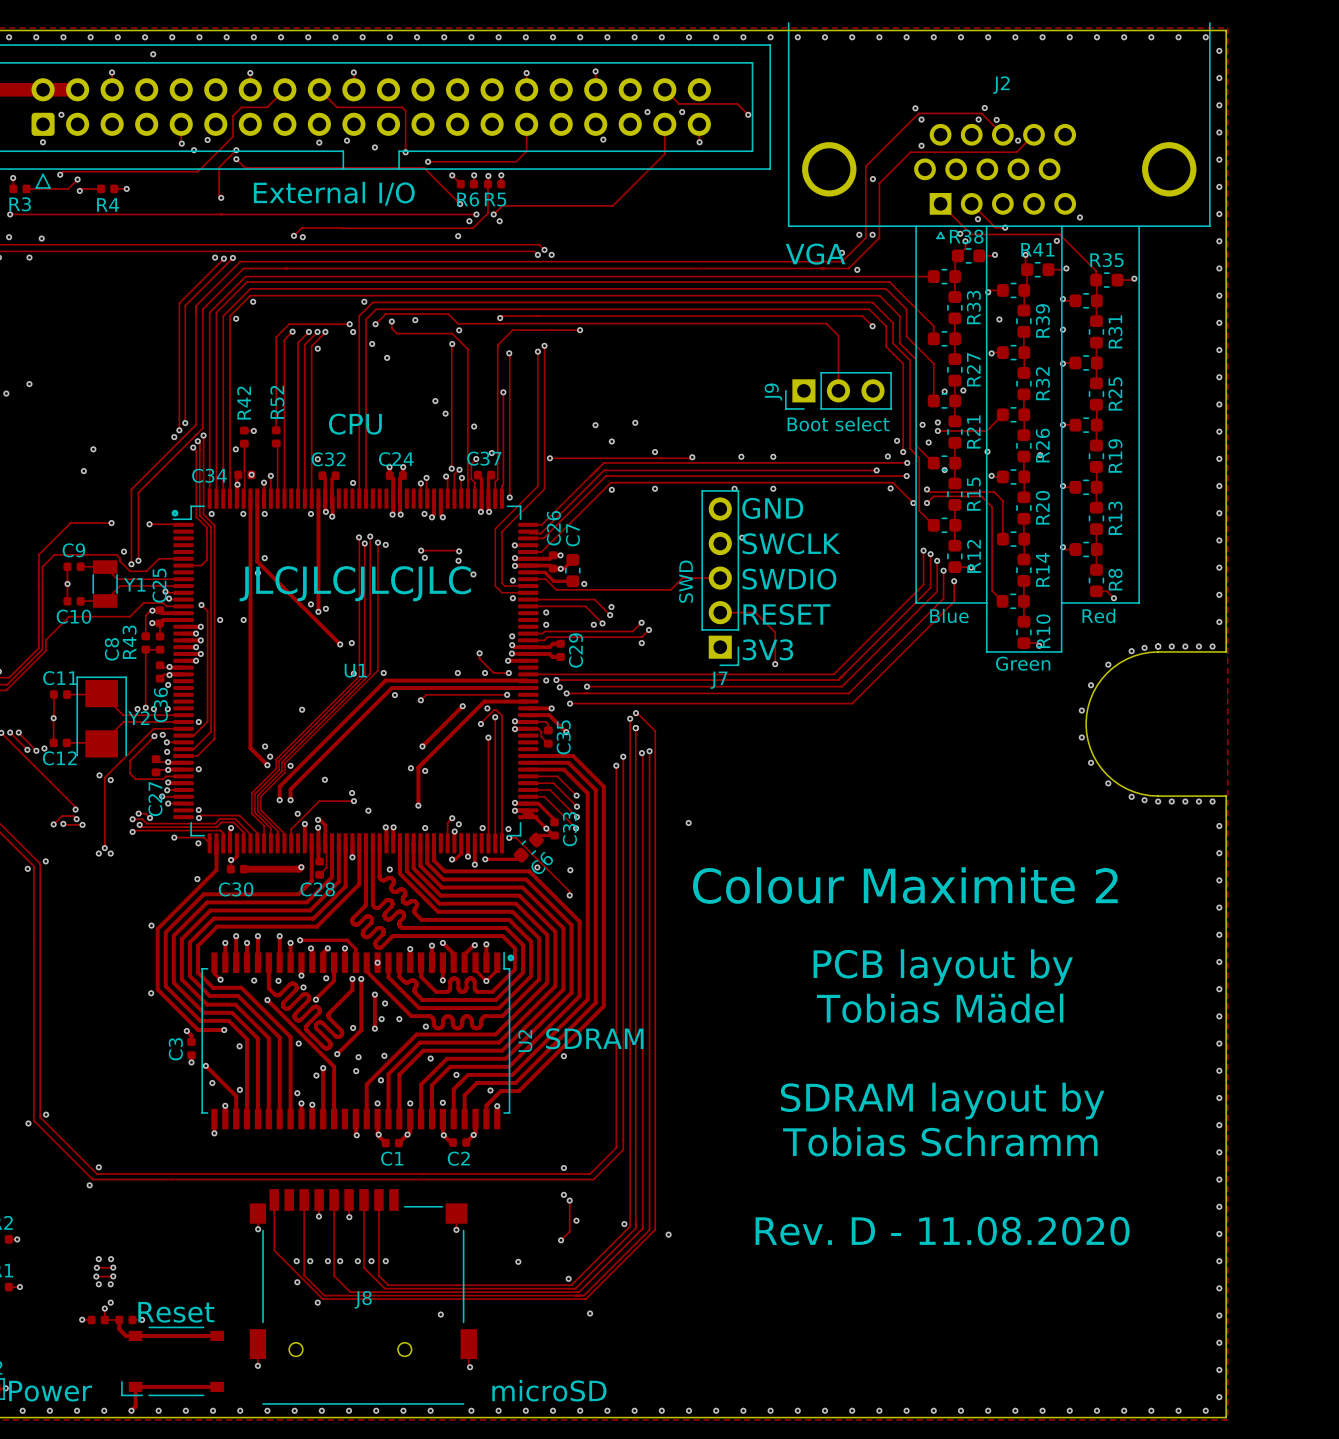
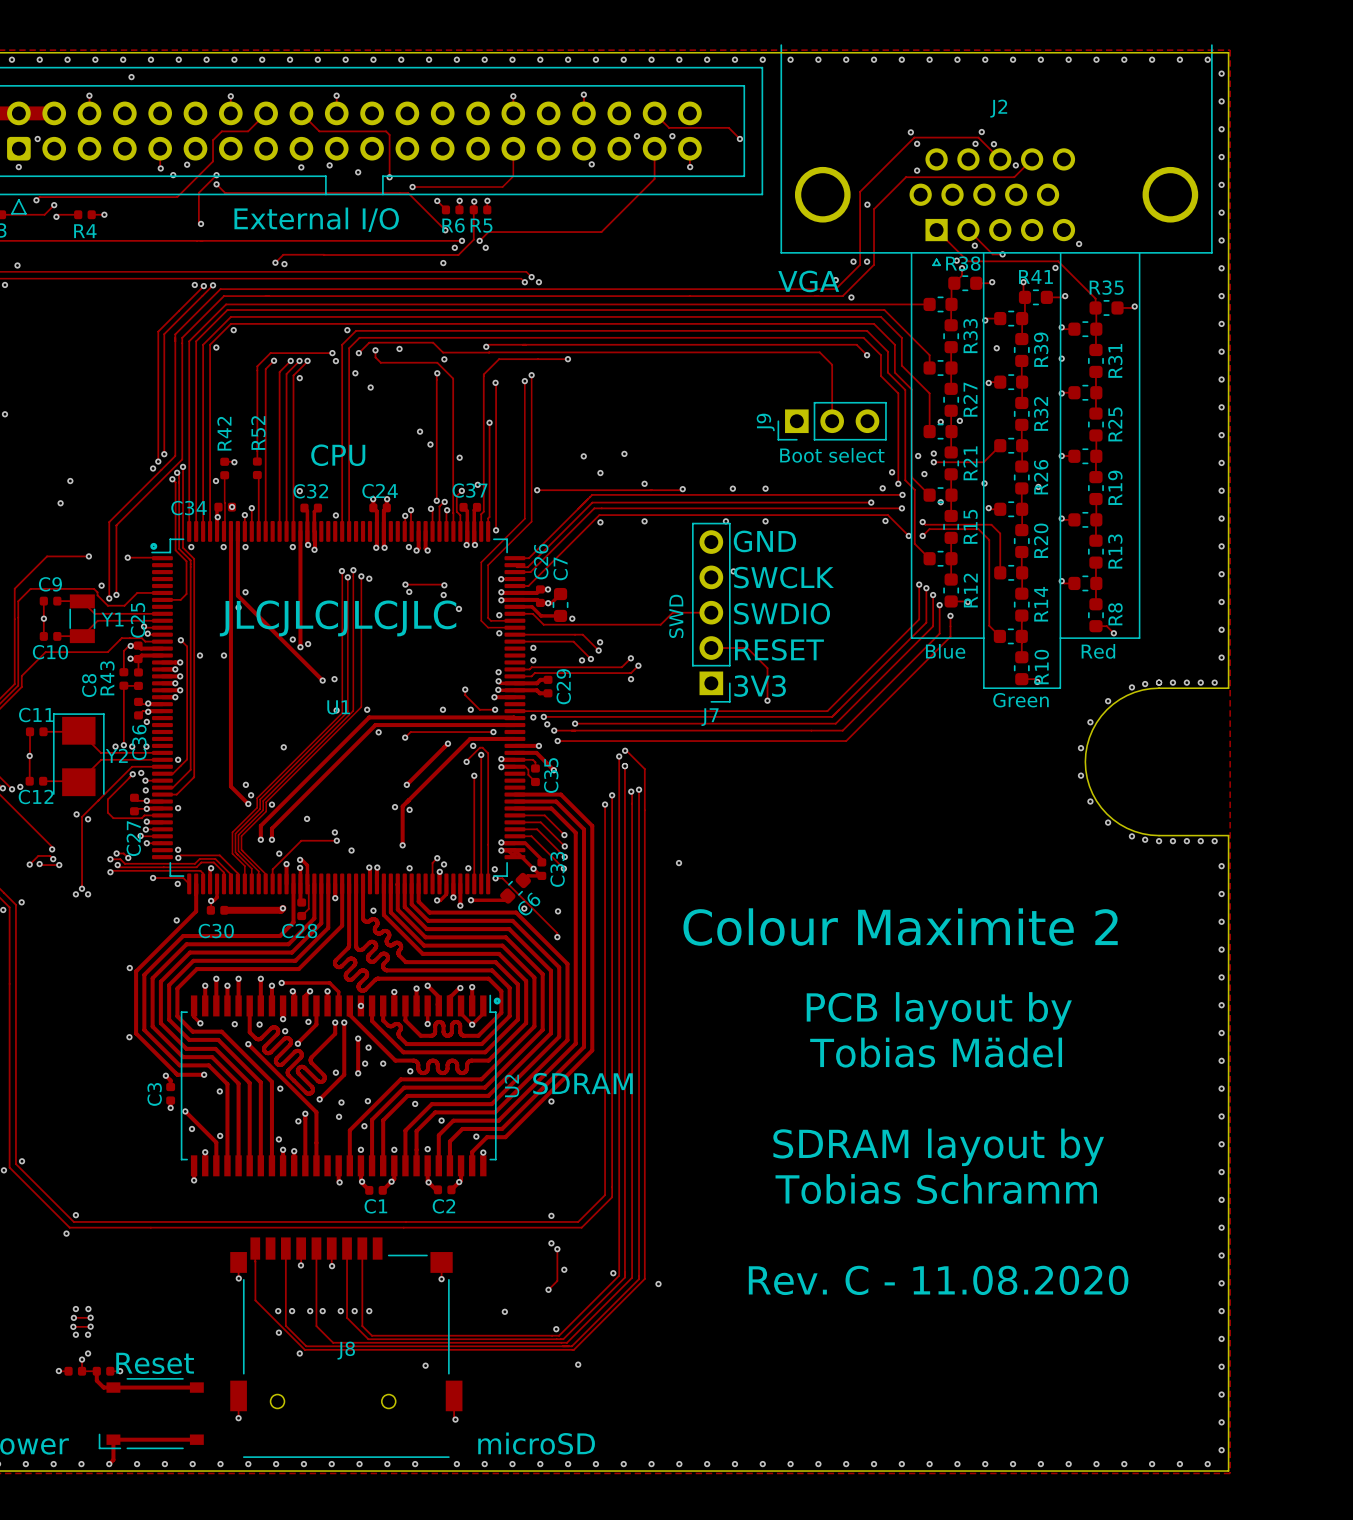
text: Rev. D - 11.08.2020 (942, 1231) -> Rev. C - 11.08.2020 (938, 1280)

